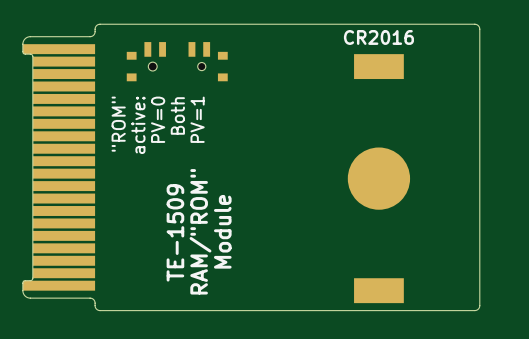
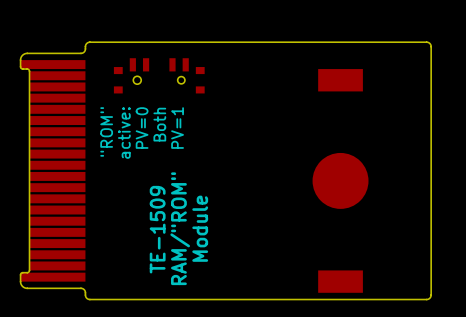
text: CR2016 (378, 37) -> none

